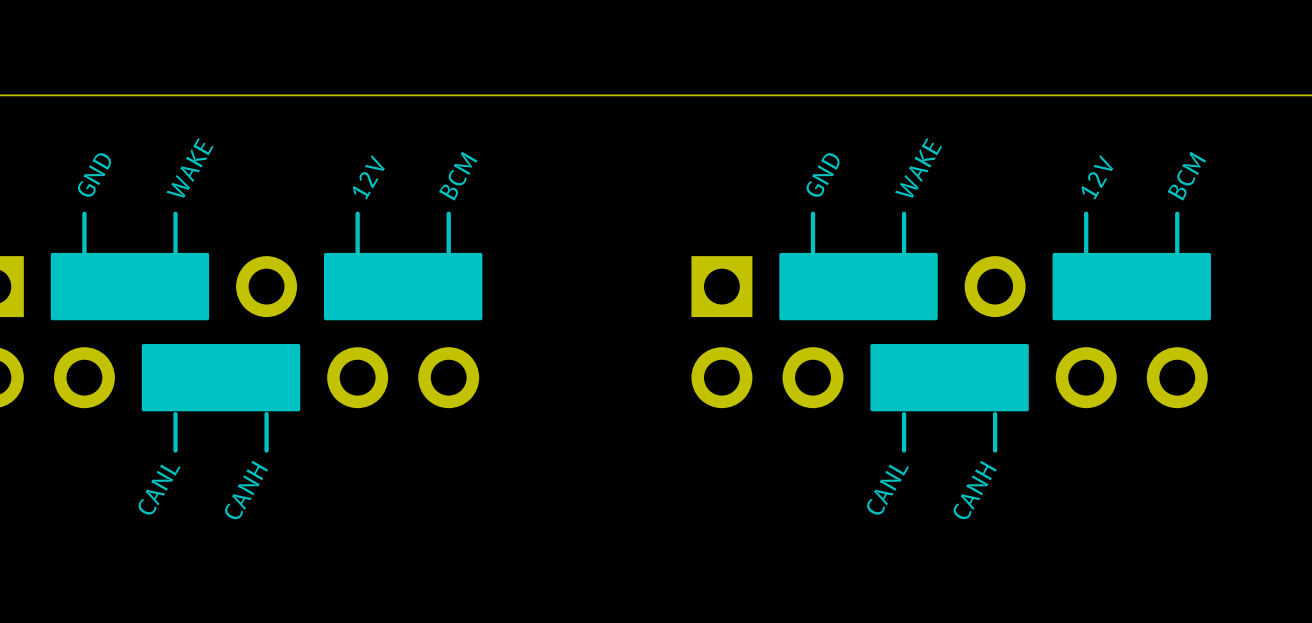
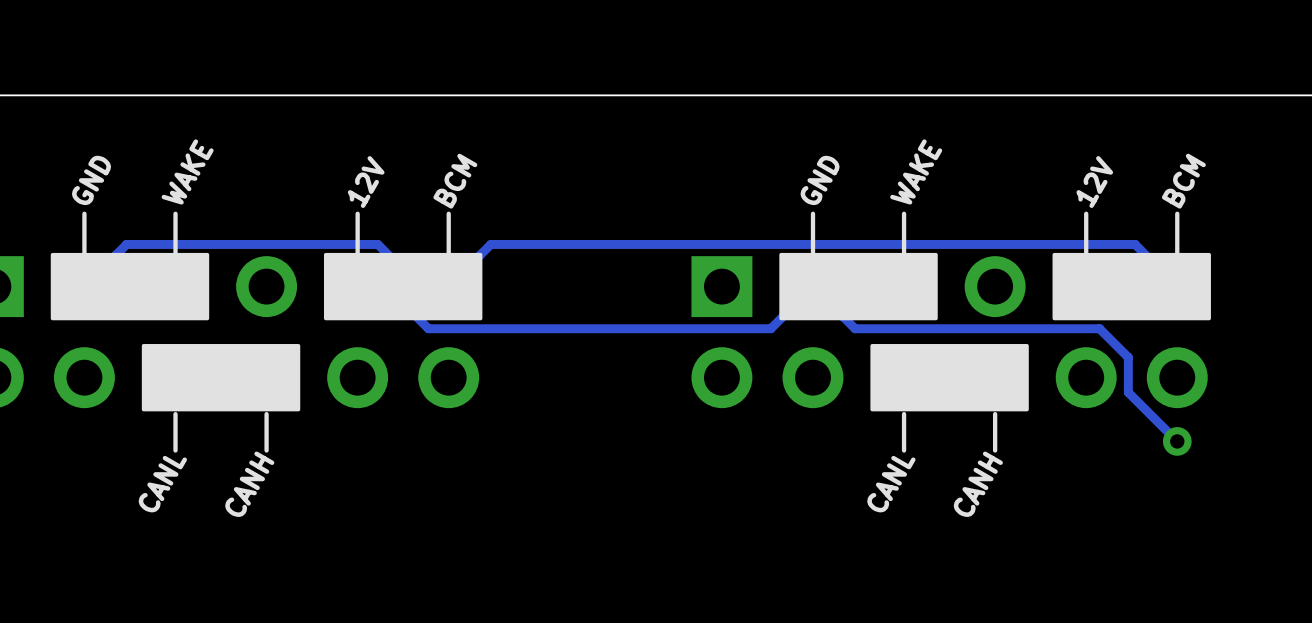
track: none -> (84, 286) (126, 244) (377, 244) (399, 266) (399, 300) (428, 328) (770, 328) (812, 286) (855, 328) (1099, 328) (1128, 357) (1128, 392) (1177, 441)
track: none -> (1177, 286) (1135, 244) (490, 244) (448, 286)
via: none -> (1177, 441)

